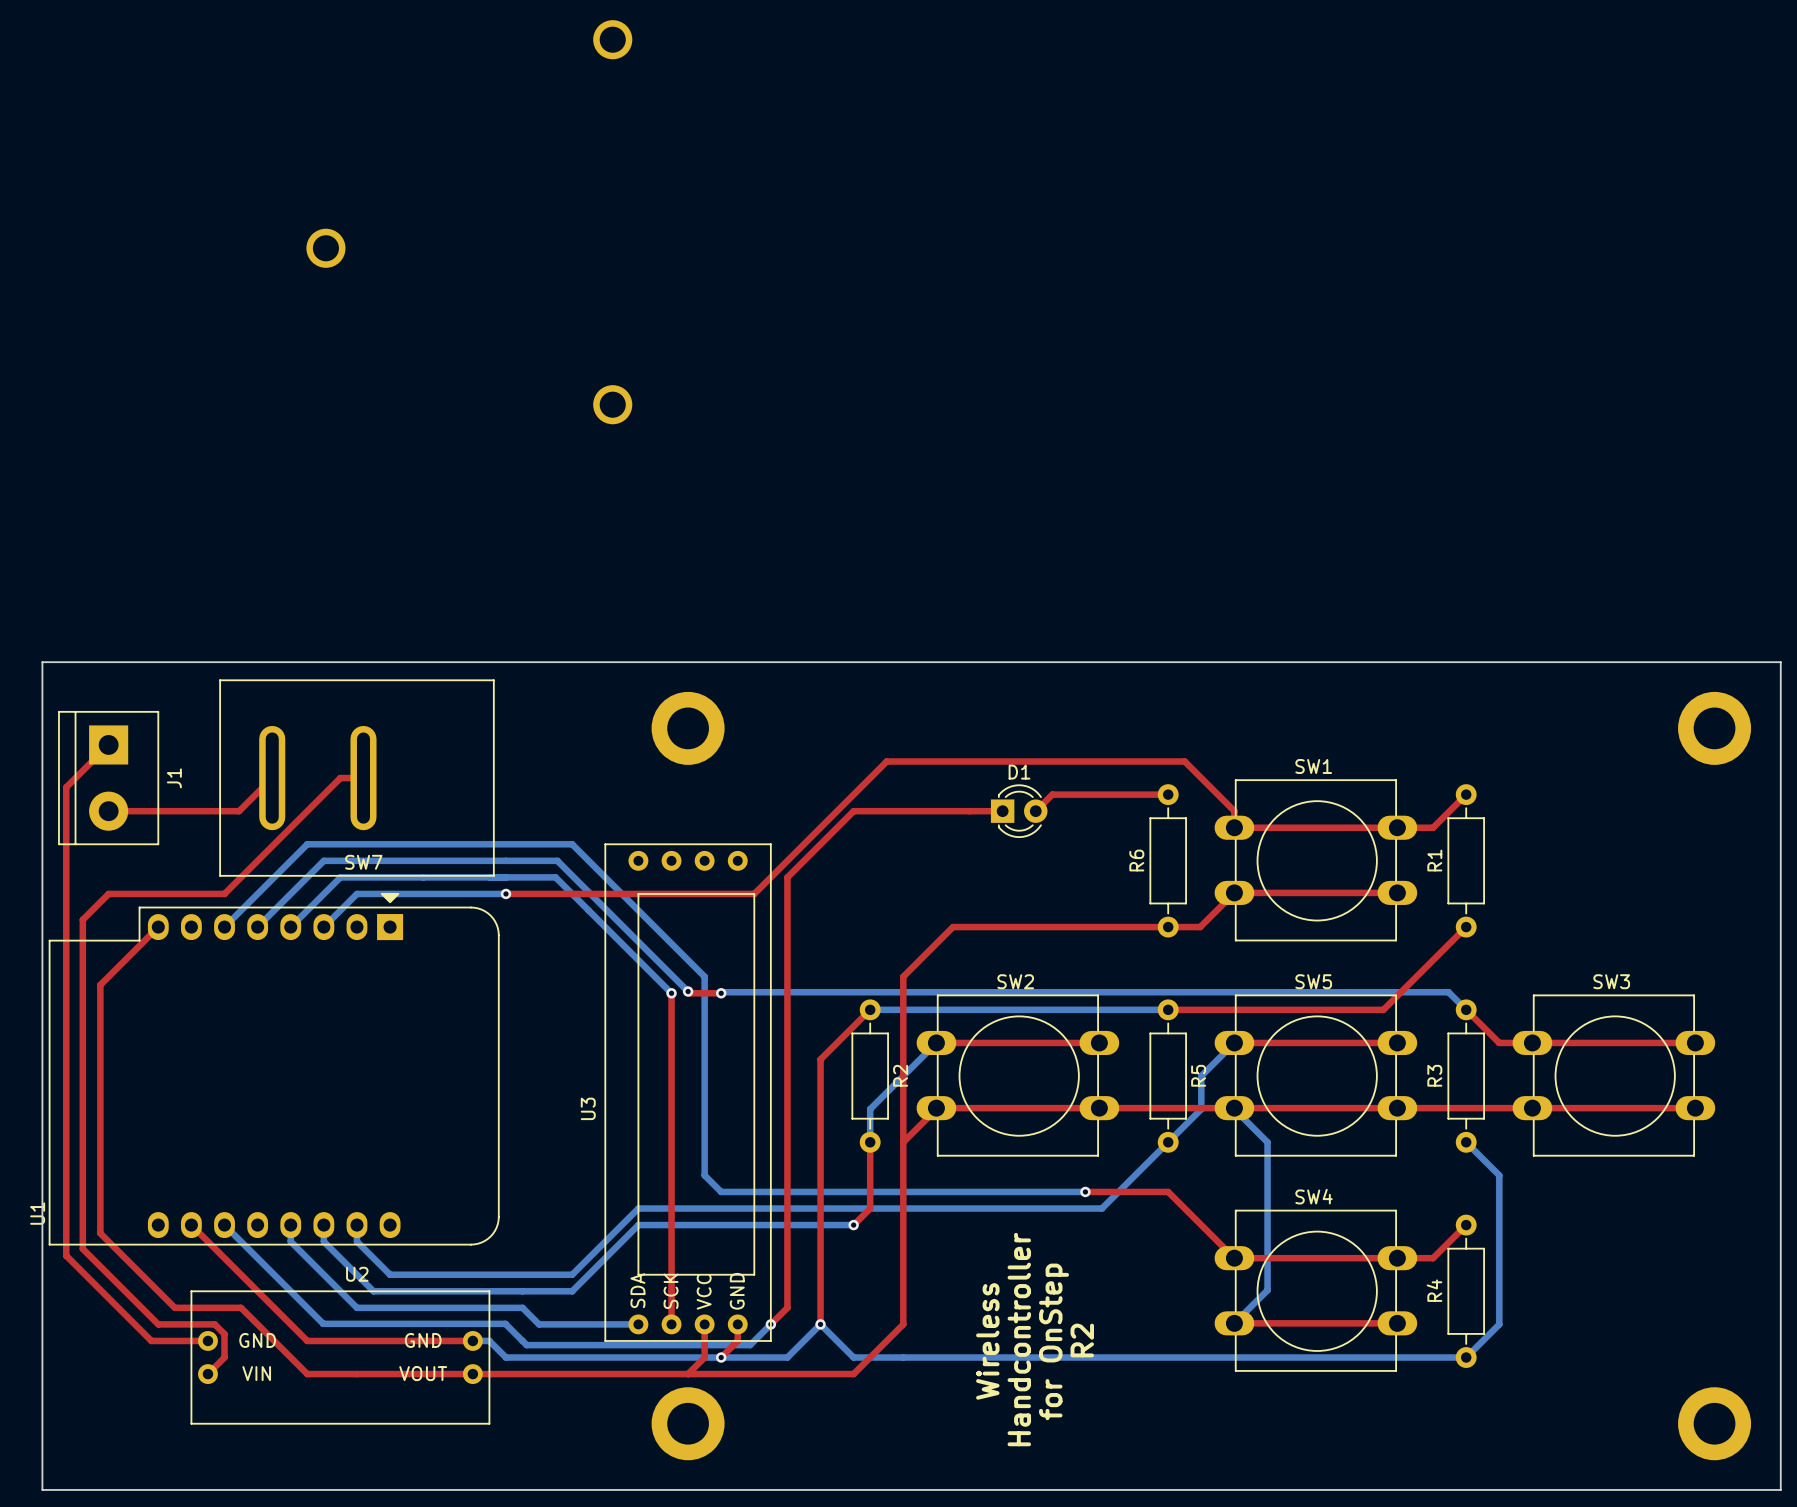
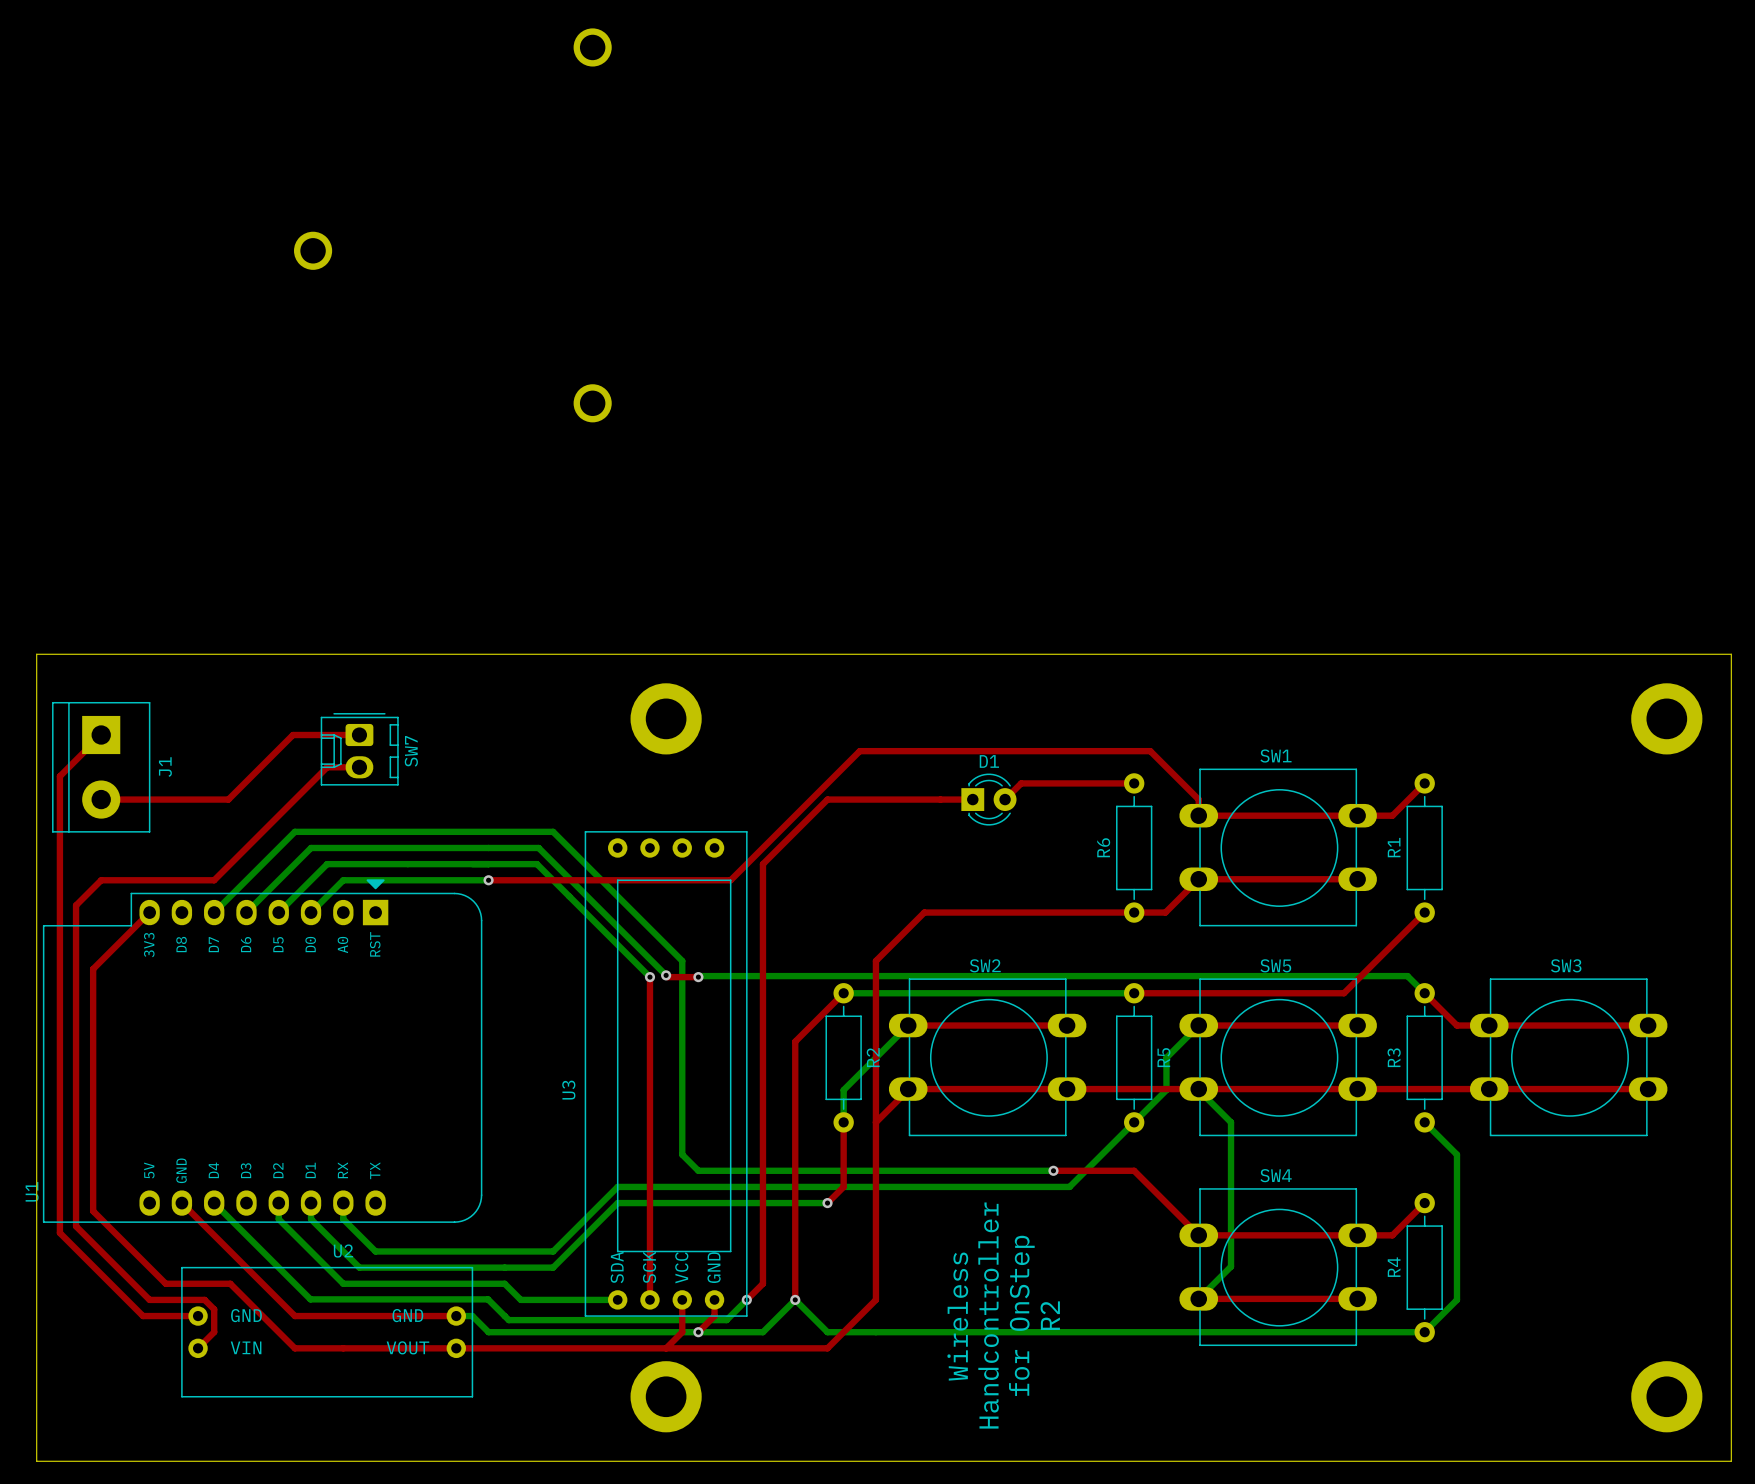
SW7 footprint: [219, 679, 495, 877] -> [320, 713, 399, 786]
top track: none -> (359, 735) (292, 735) (260, 767)
SW7 name position: SW7 (363, 862) -> SW7 (411, 751)
U1 footprint: [48, 892, 500, 1246] -> [42, 879, 483, 1223]

